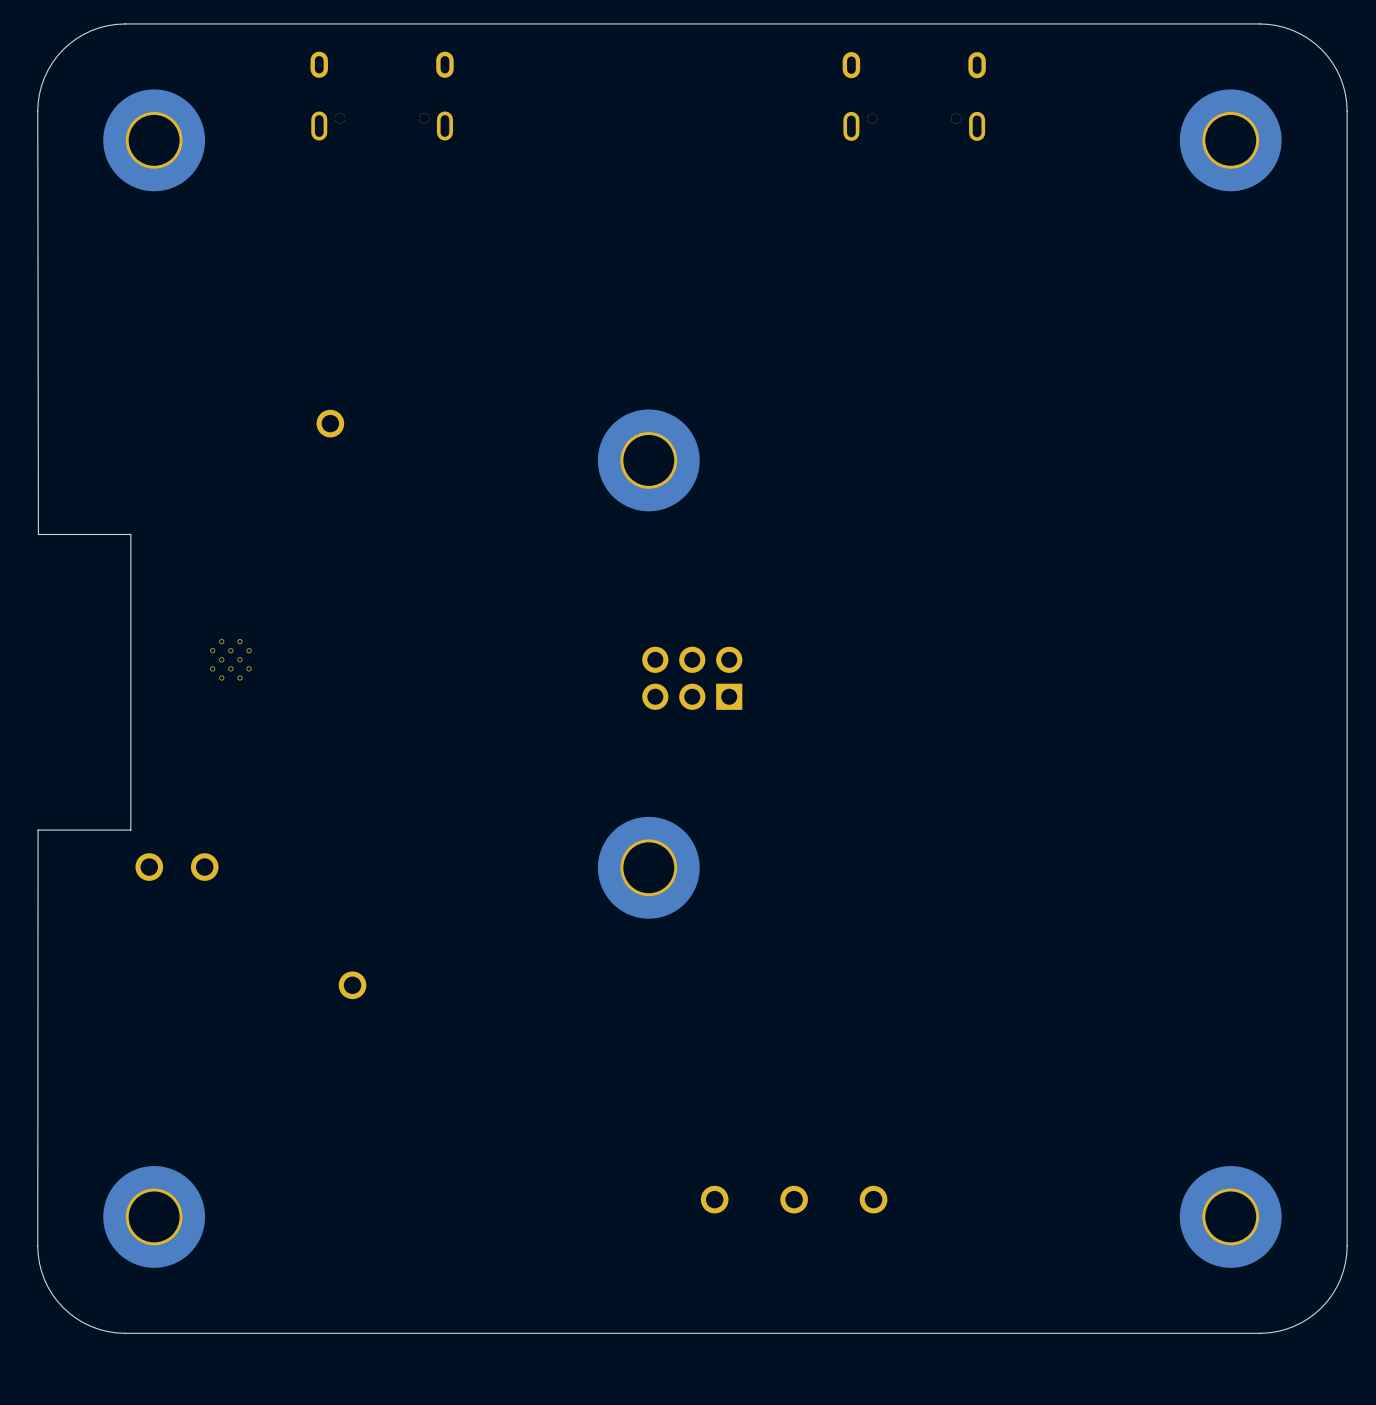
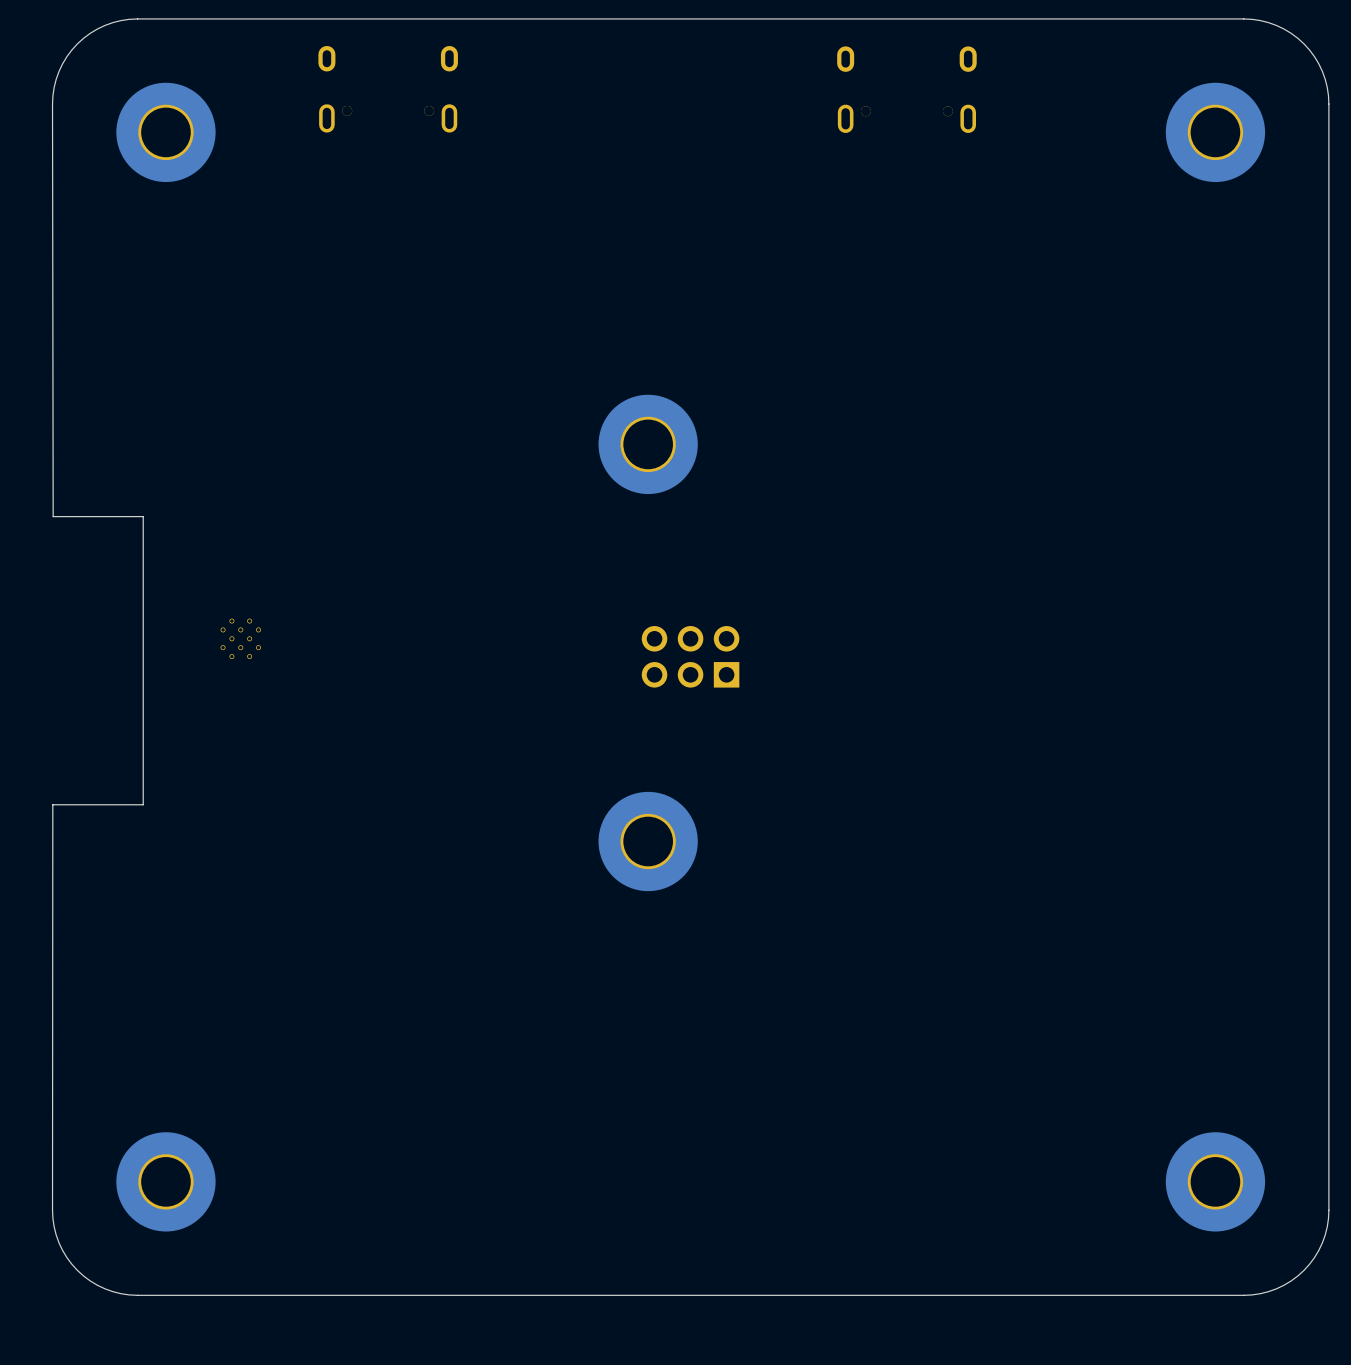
part: (330, 423) -> none
part: (149, 867) -> none
part: (204, 867) -> none
part: (352, 985) -> none
part: (714, 1199) -> none
part: (794, 1199) -> none
part: (873, 1199) -> none

